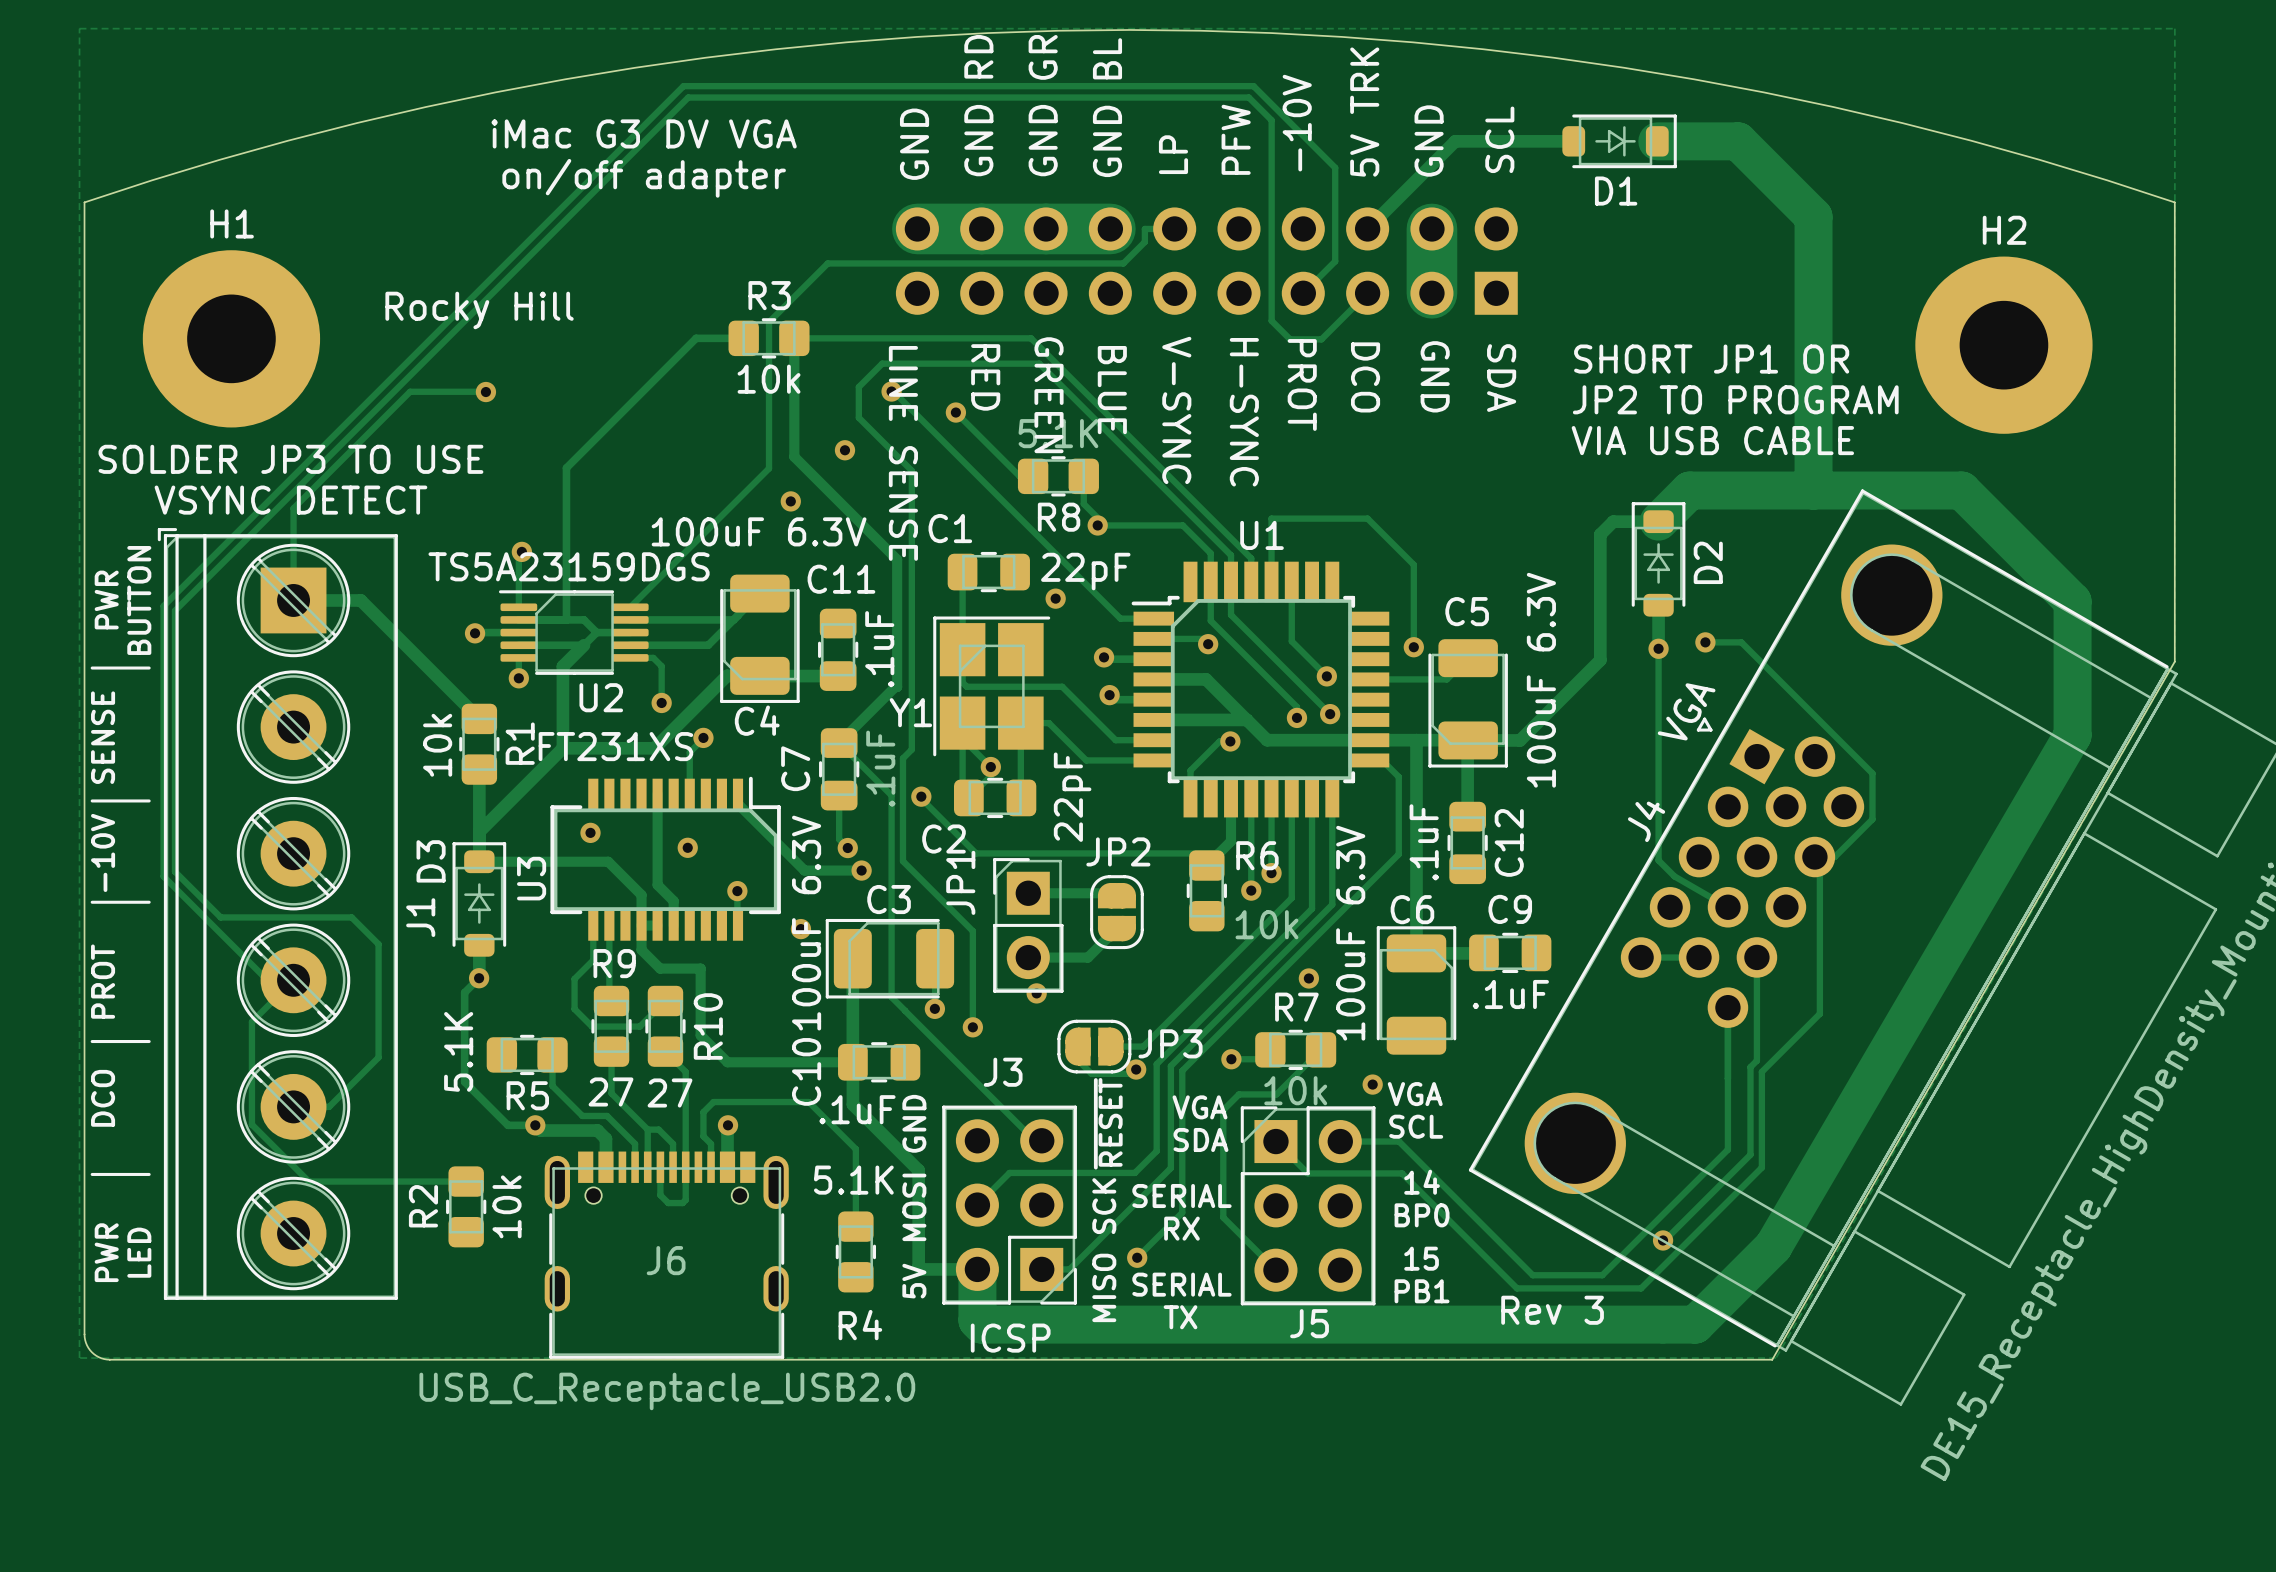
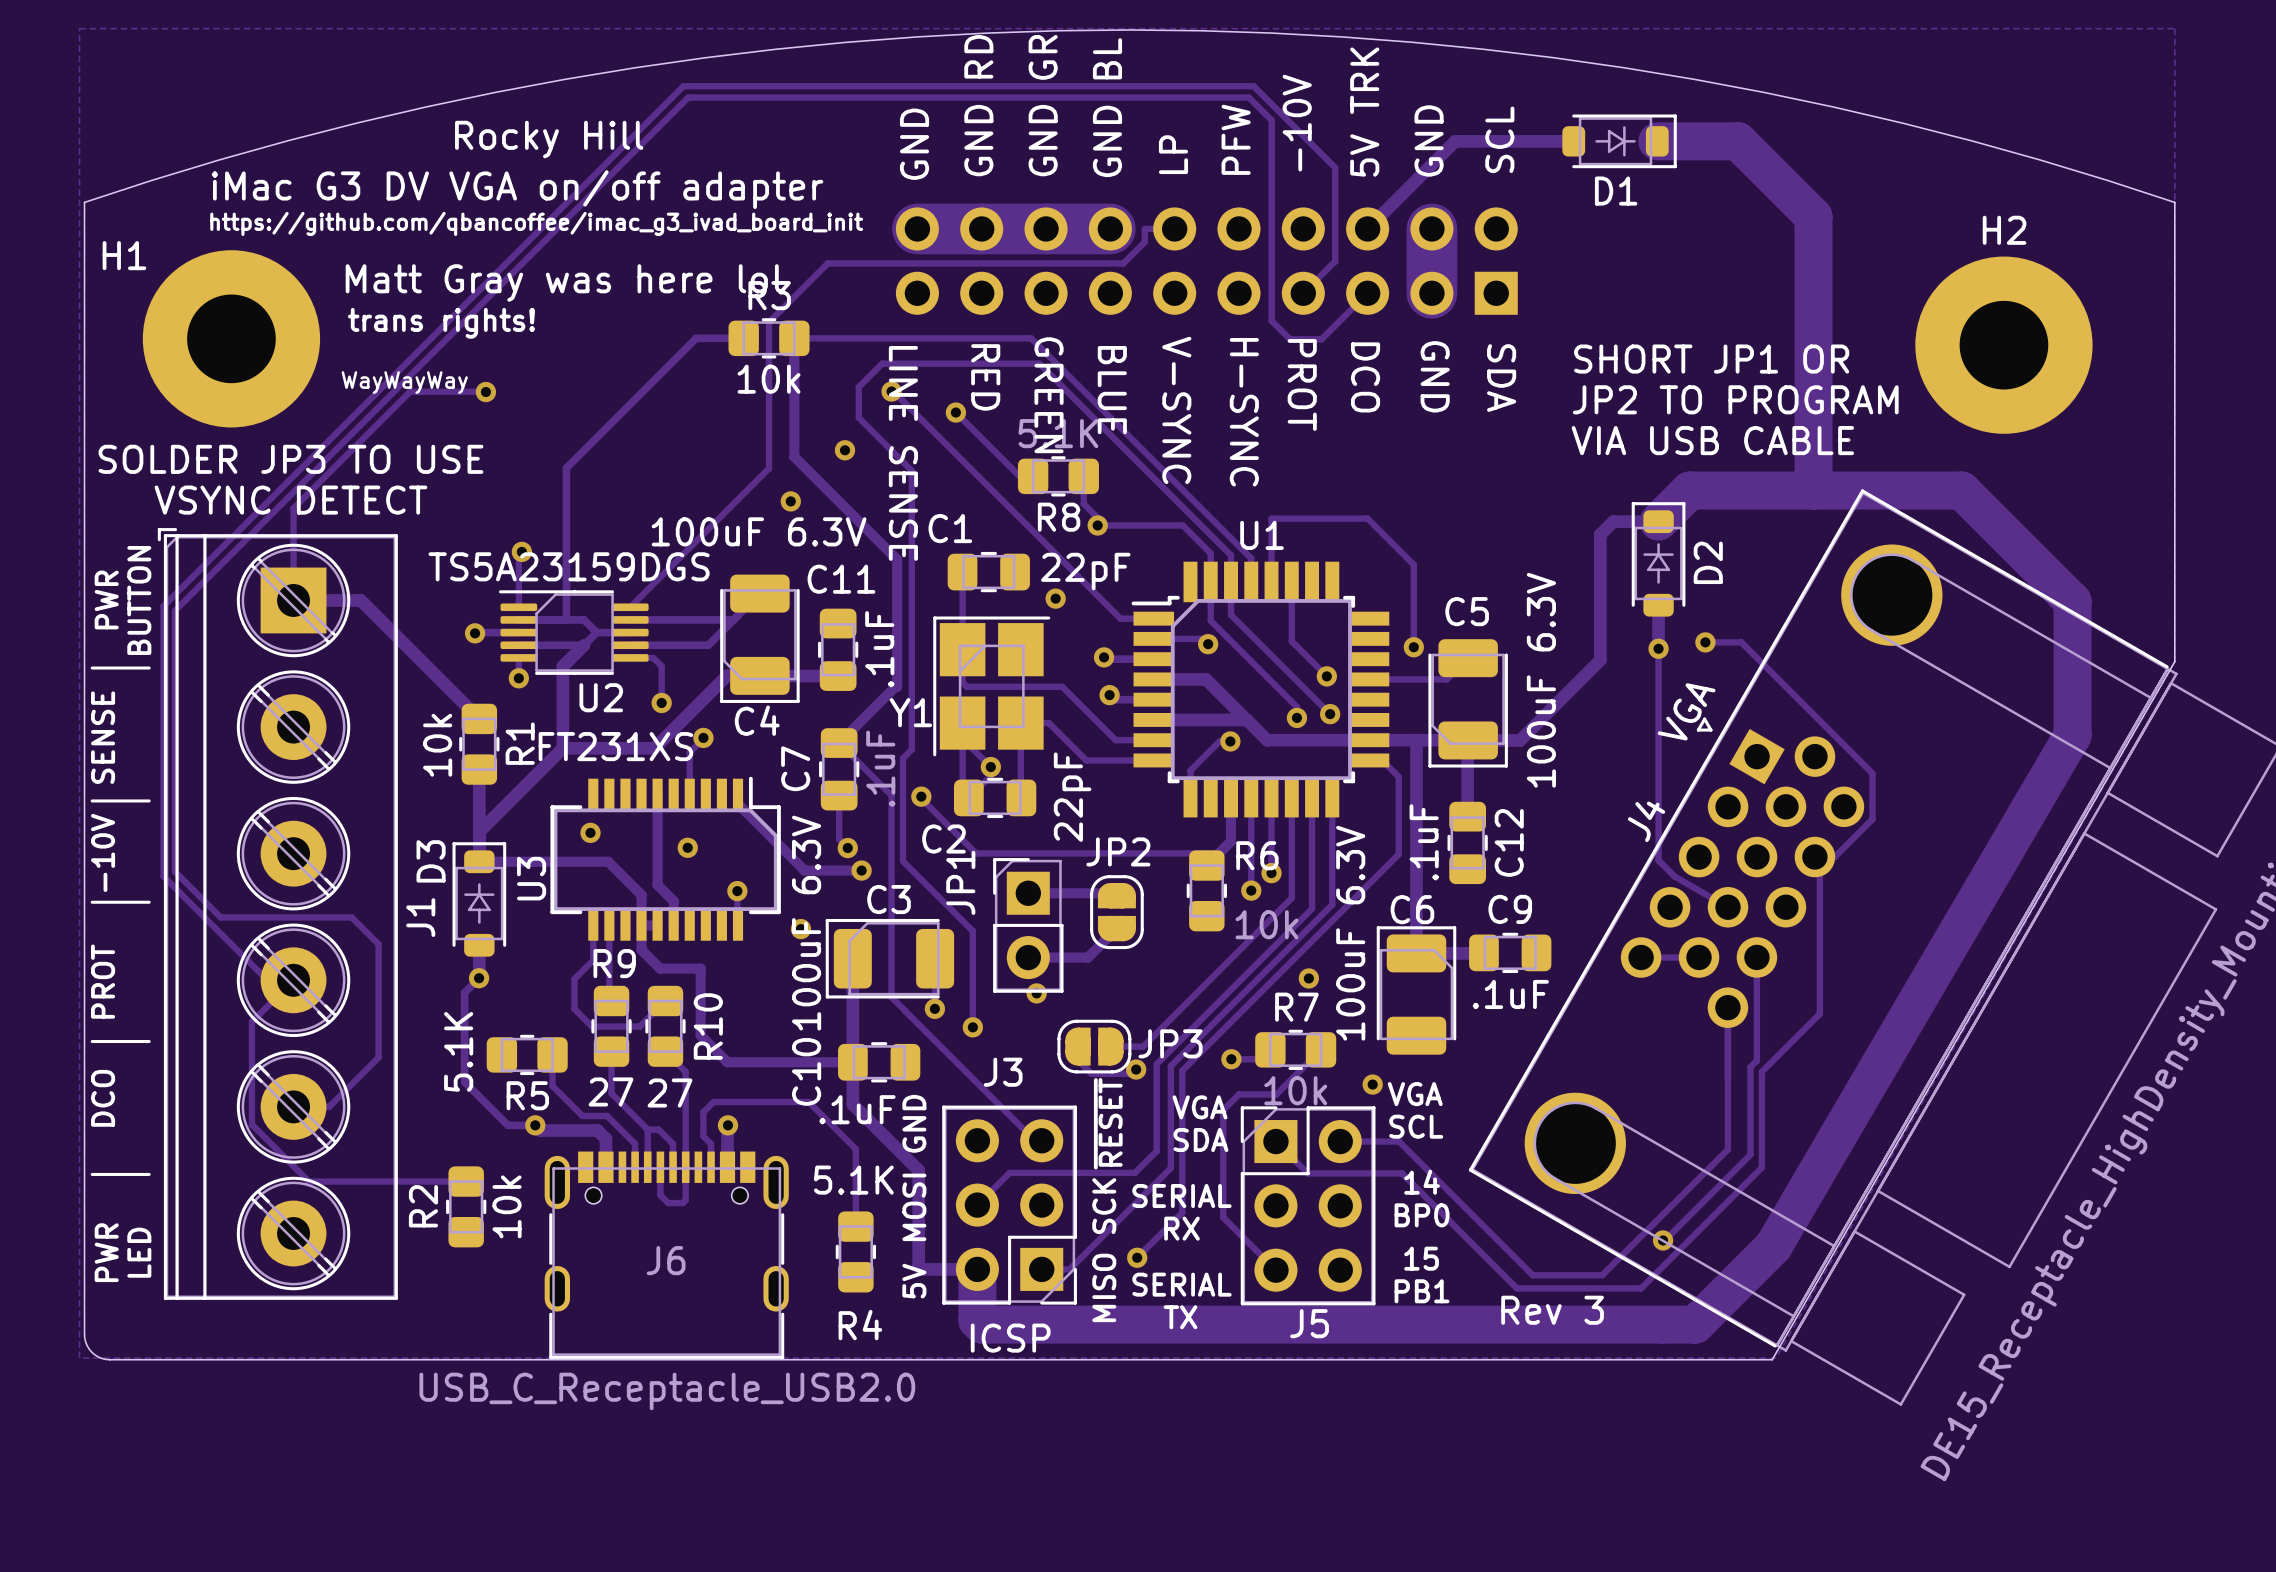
text: iMac G3 DV VGA (644, 133) -> none
text: on/off adapter (644, 178) -> none
text: none -> iMac G3 DV VGA on/off adapter (517, 189)
H1 name position: H1 (232, 223) -> H1 (124, 255)
text: none -> https://github.com/qbancoffee/imac_g3_ivad_board_init (536, 223)
text: none -> Matt Gray was here lol (564, 283)
text position: Rocky Hill (479, 310) -> Rocky Hill (549, 139)
text: none -> trans rights! (441, 323)
text: none -> WayWayWay (404, 382)

